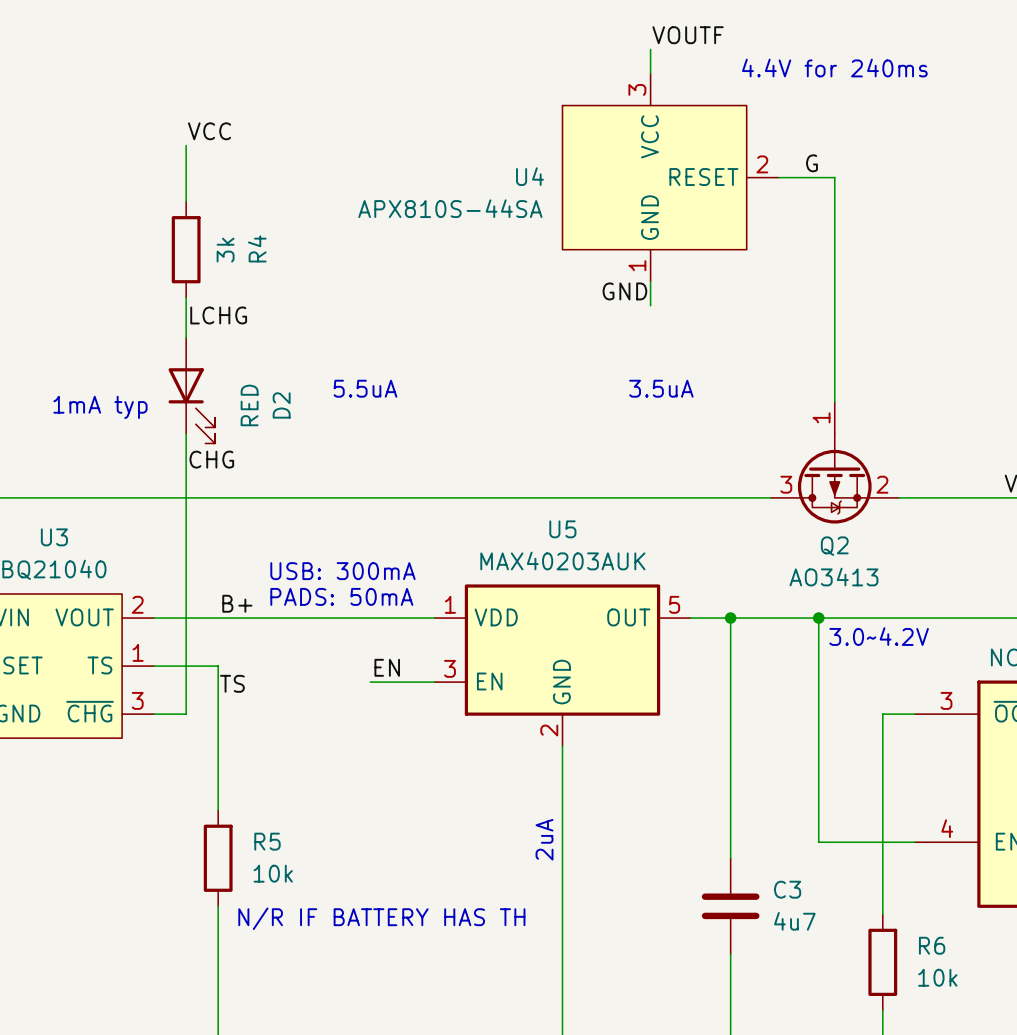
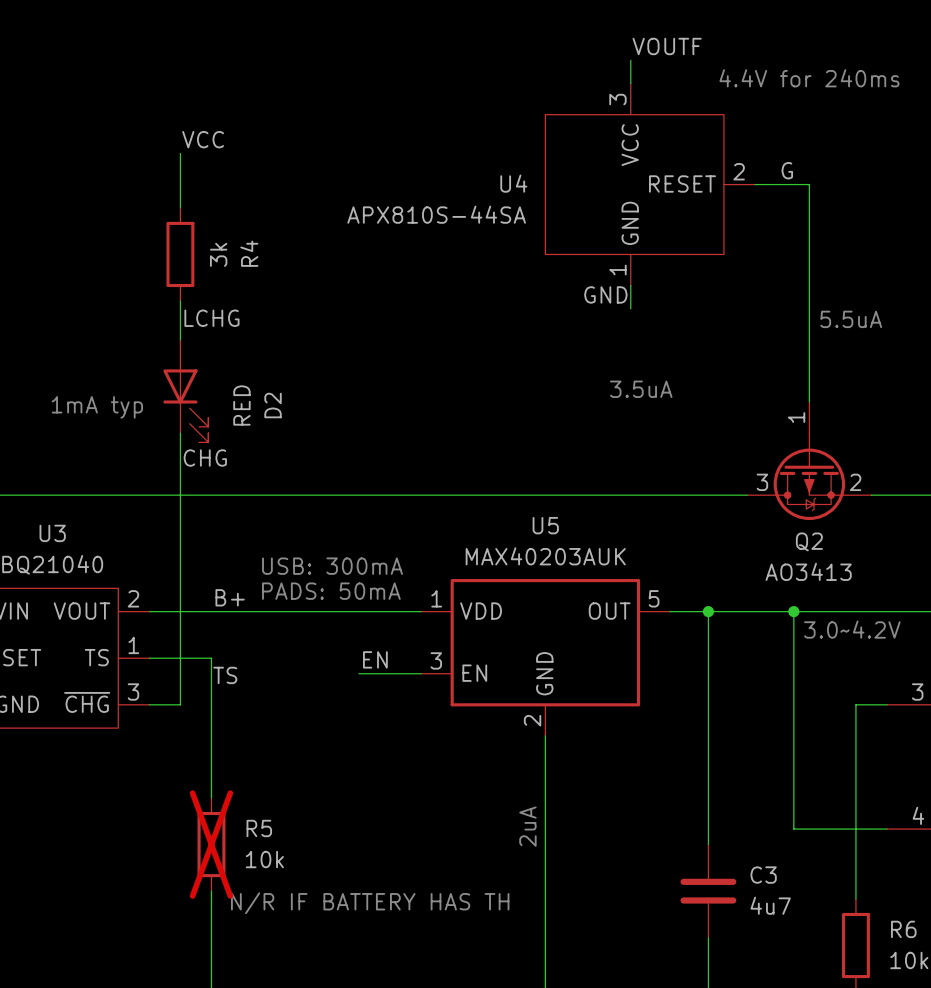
text: none -> 5.5uA (851, 319)
text: 5.5uA (365, 388) -> none
R5 do-not-place cross: none -> (211, 844)

